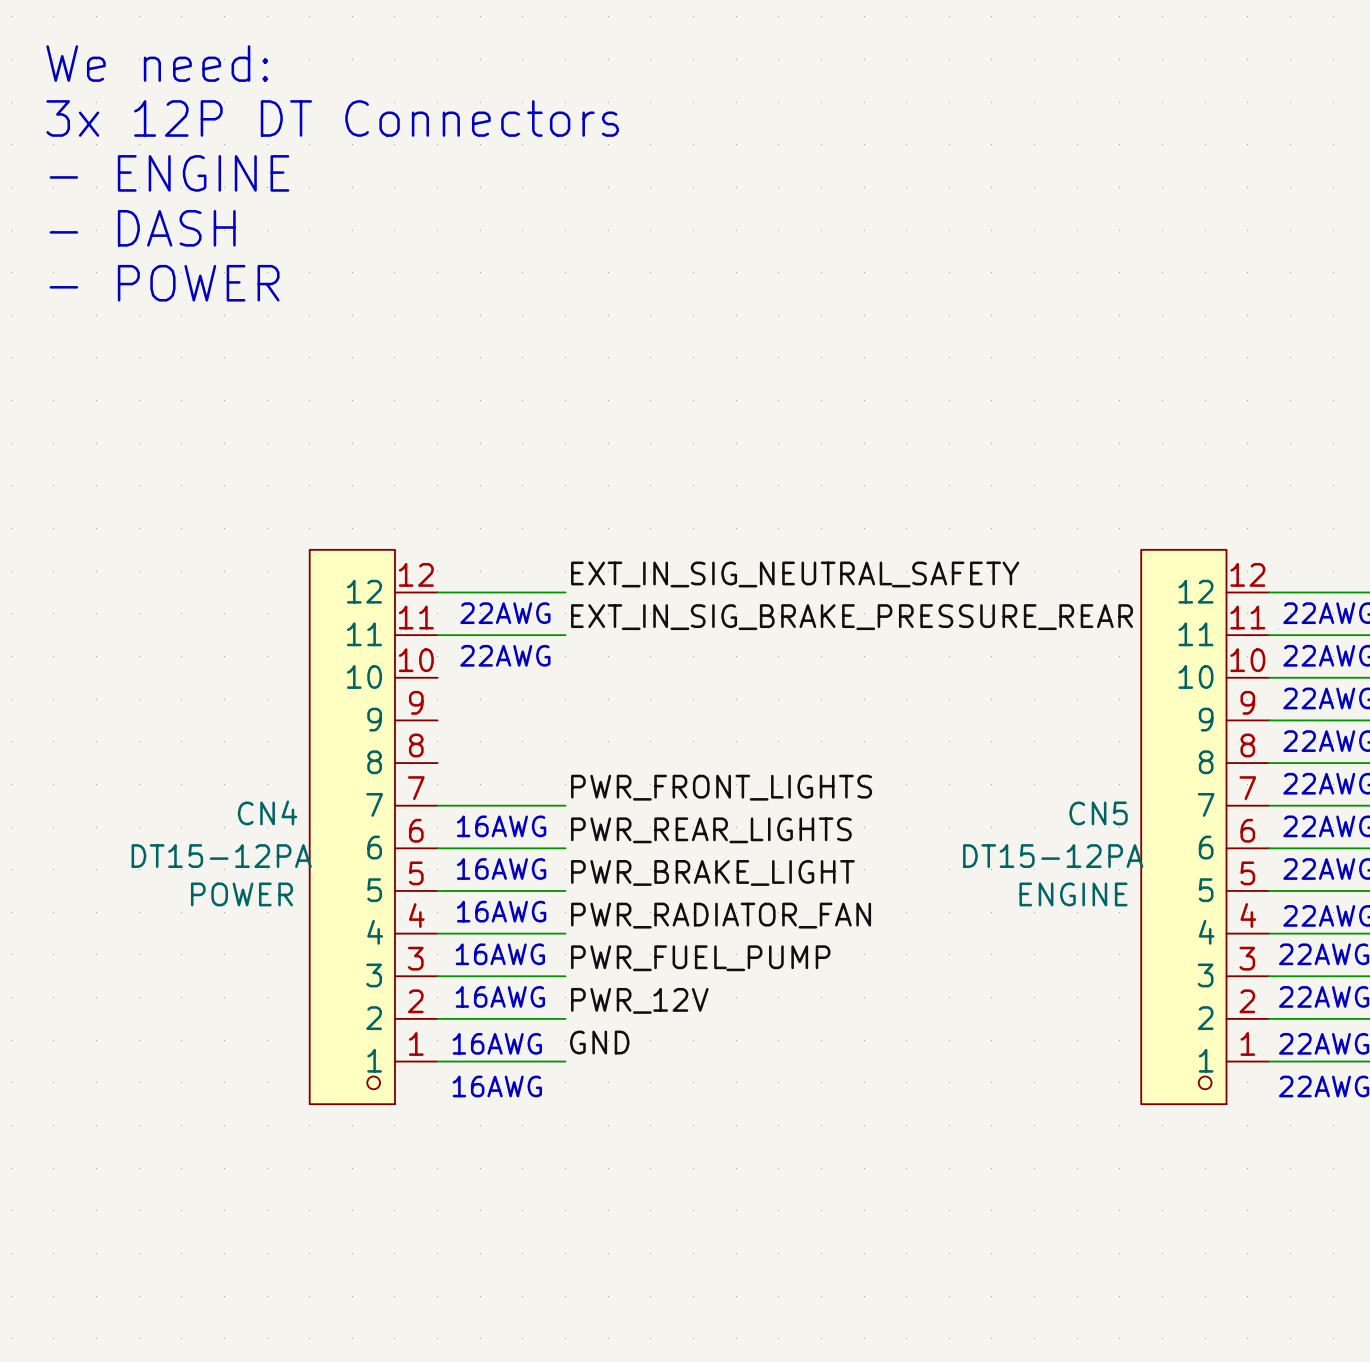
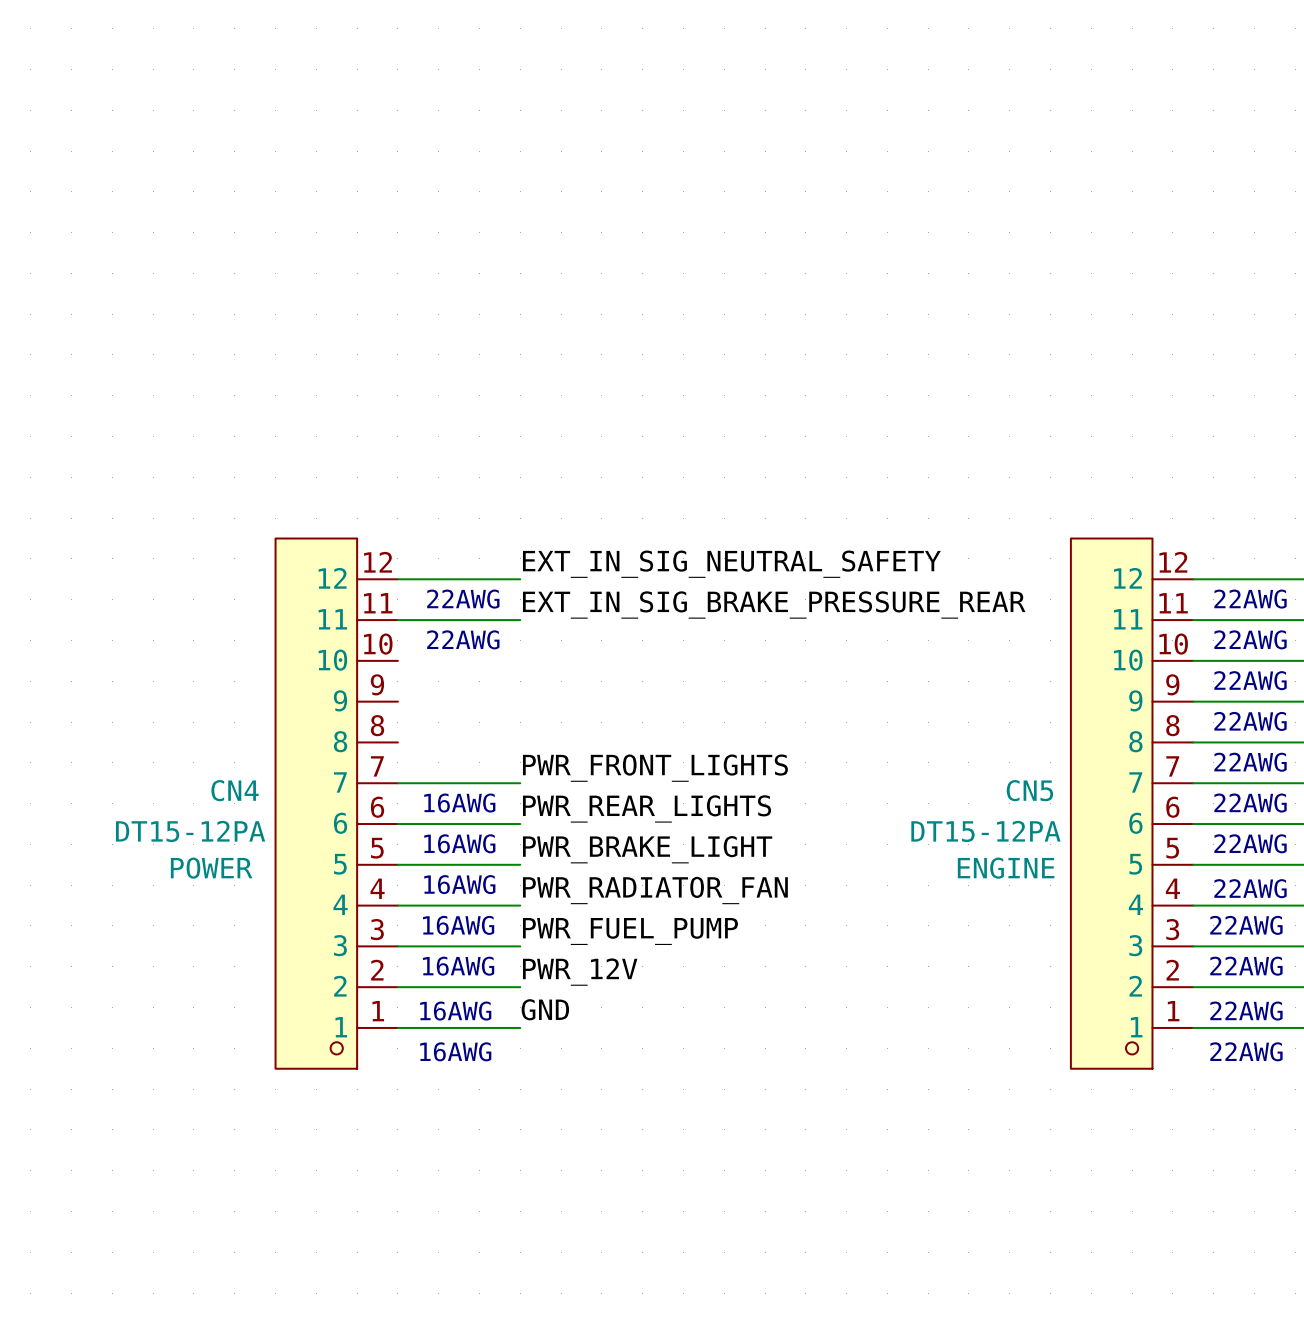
text: We need: (157, 63) -> none
text: 3x 12P DT Connectors (332, 118) -> none
text: - ENGINE (169, 173) -> none
text: - DASH (142, 228) -> none
text: - POWER (164, 283) -> none

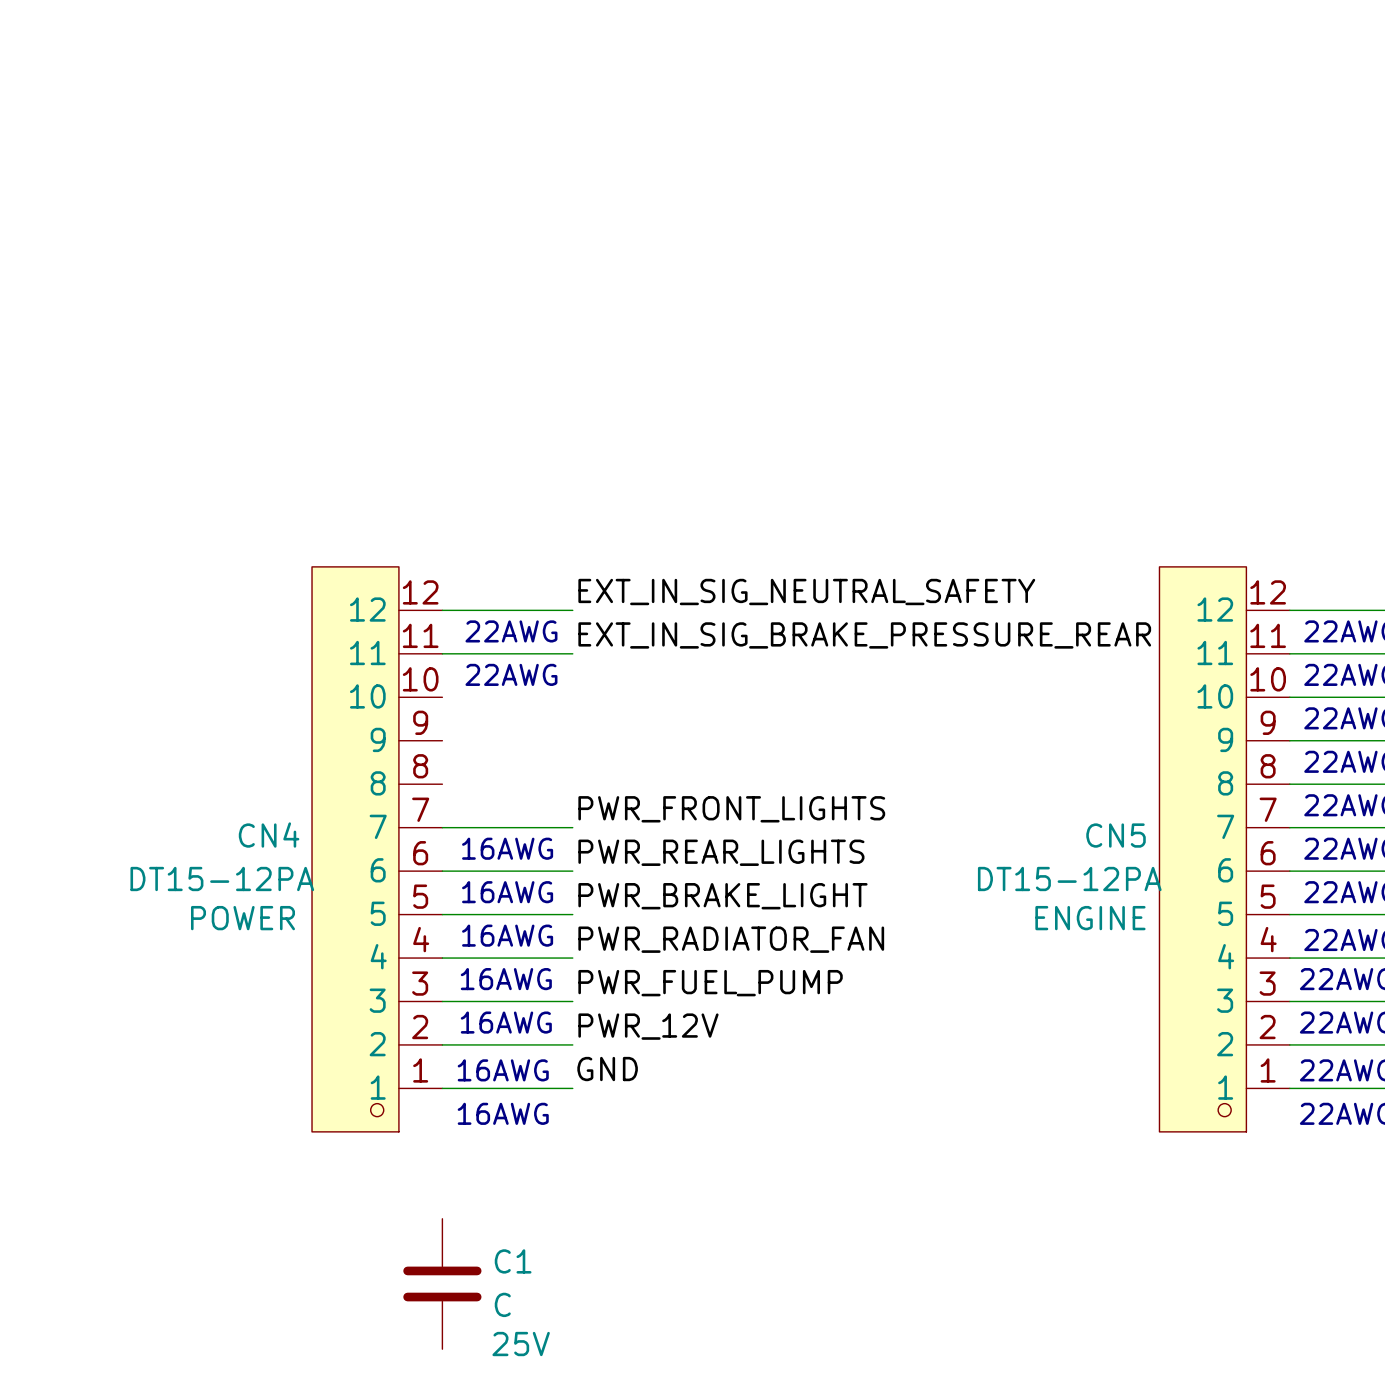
C1: none -> C (442, 1283)

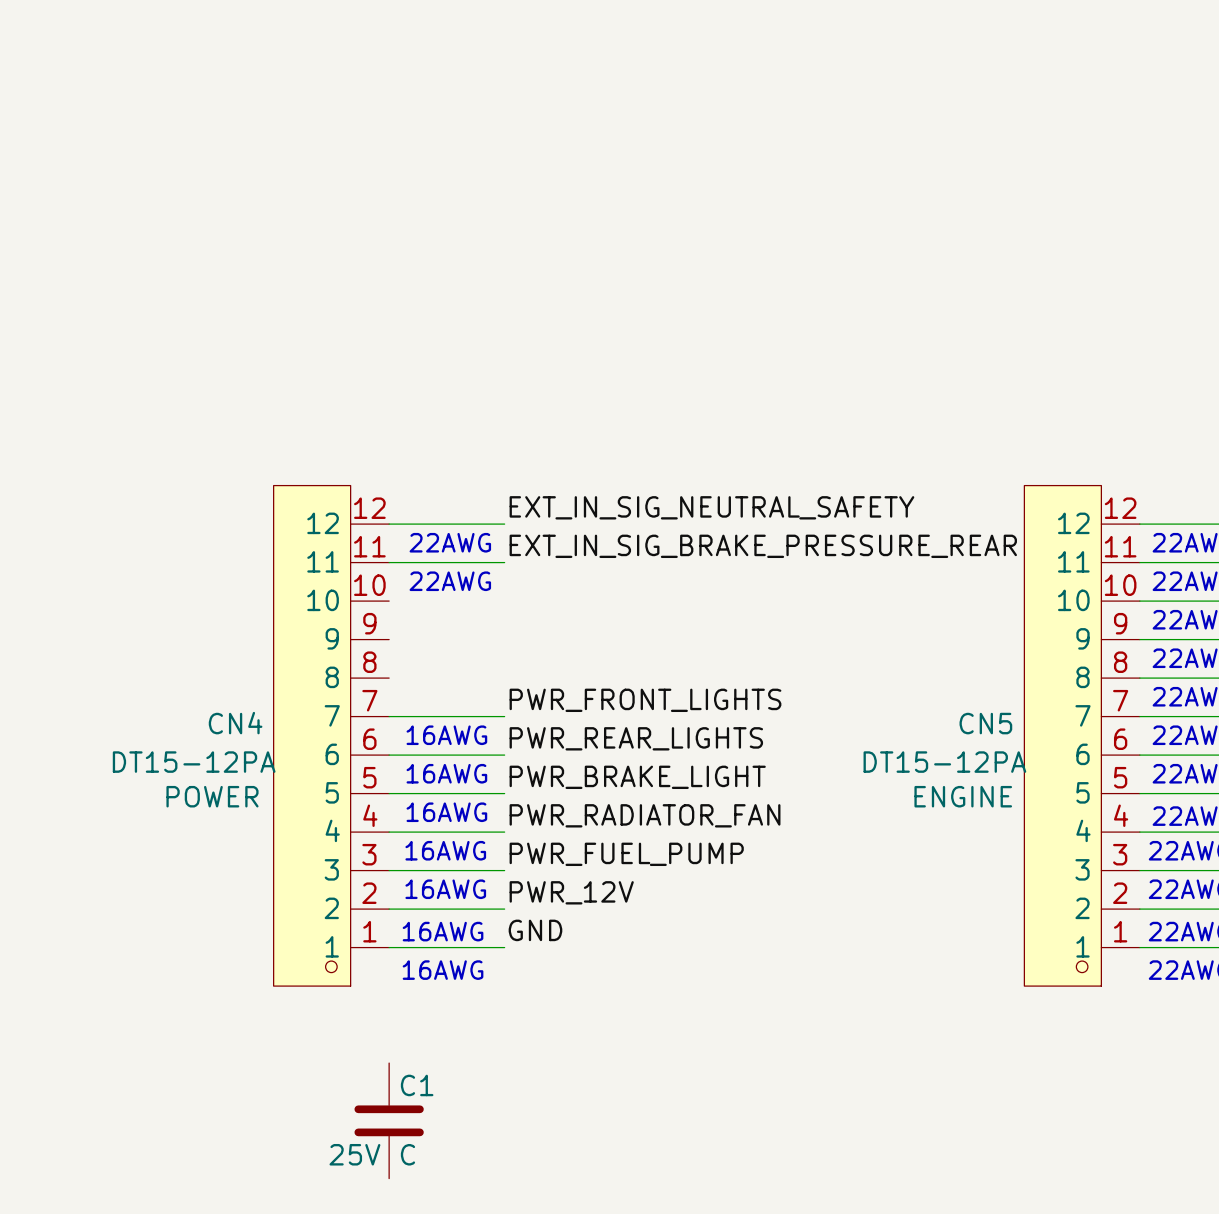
C1 name position: C1 (513, 1261) -> C1 (417, 1085)
C1 value position: C (502, 1304) -> C (407, 1154)
C1 text position: 25V (521, 1344) -> 25V (354, 1154)

